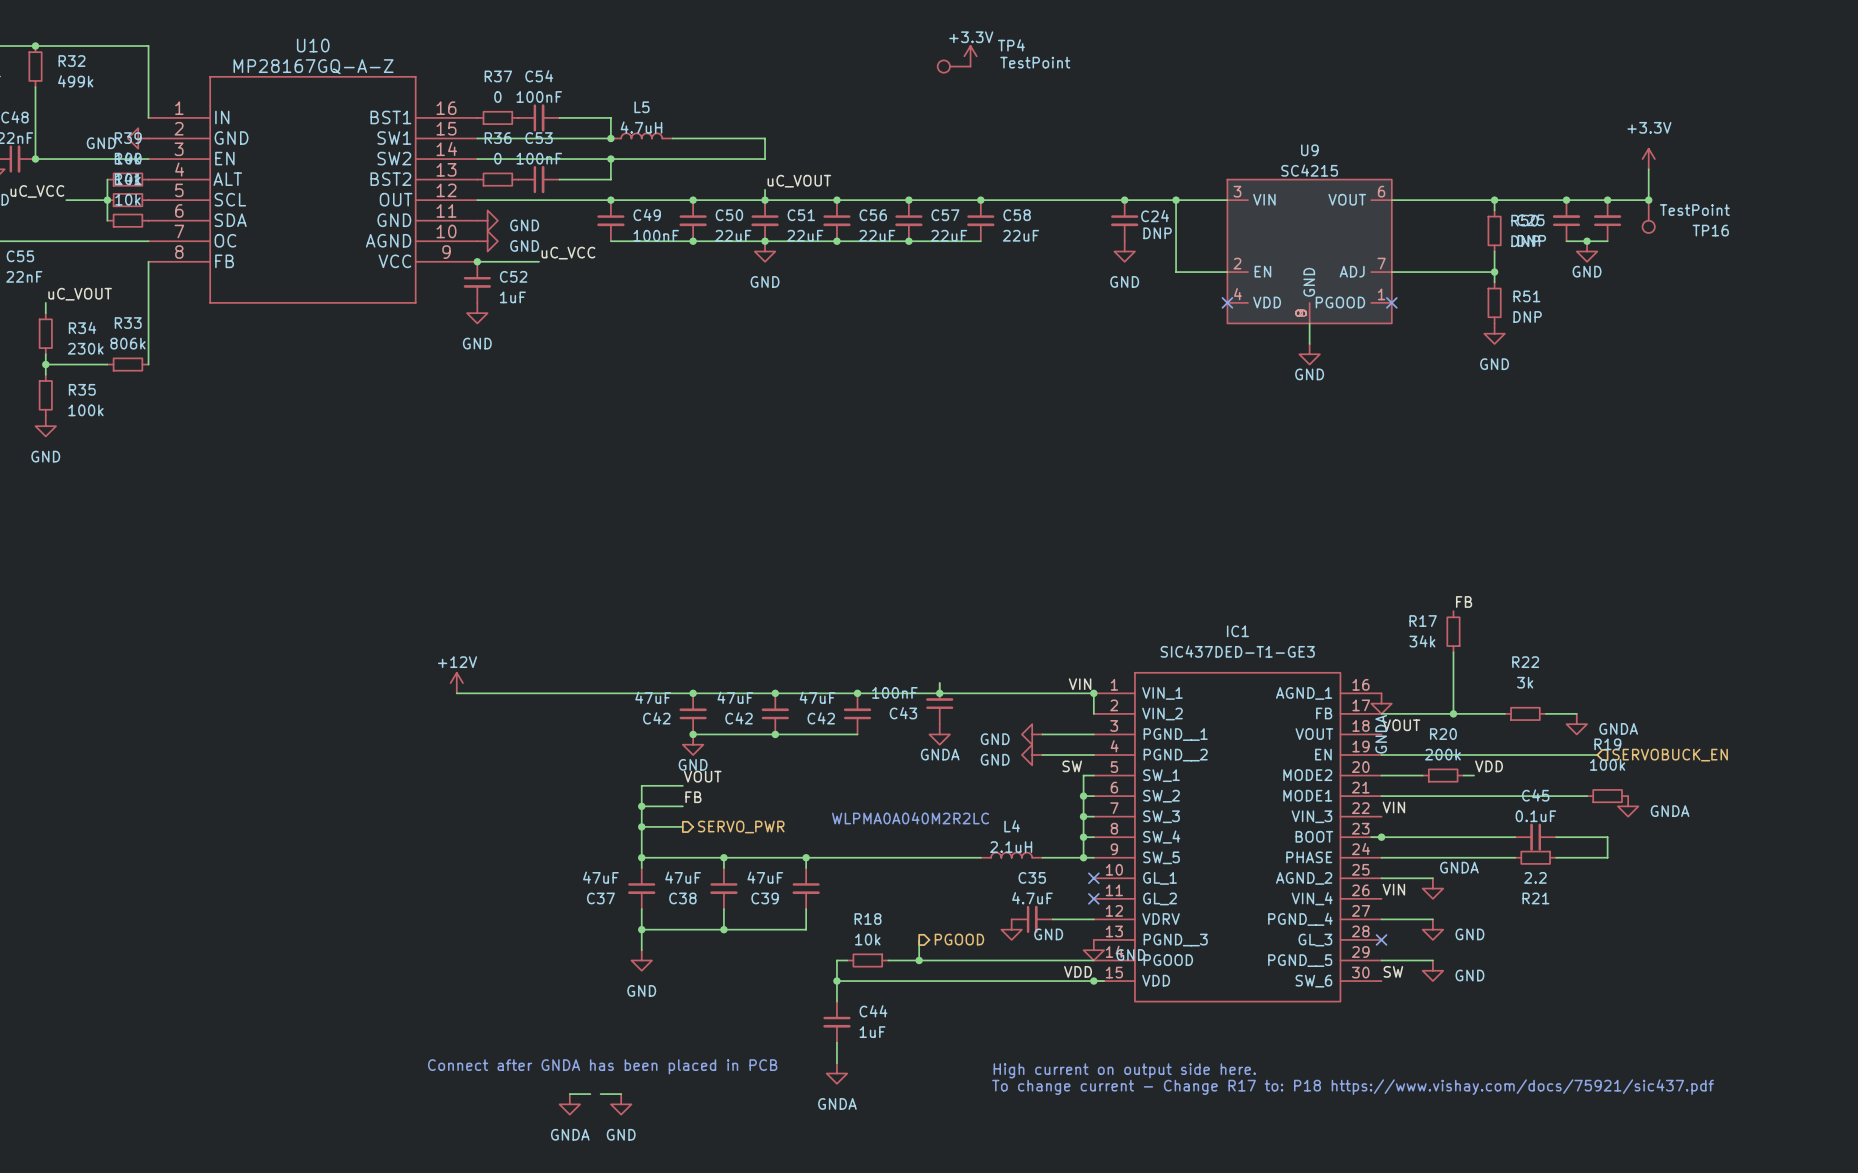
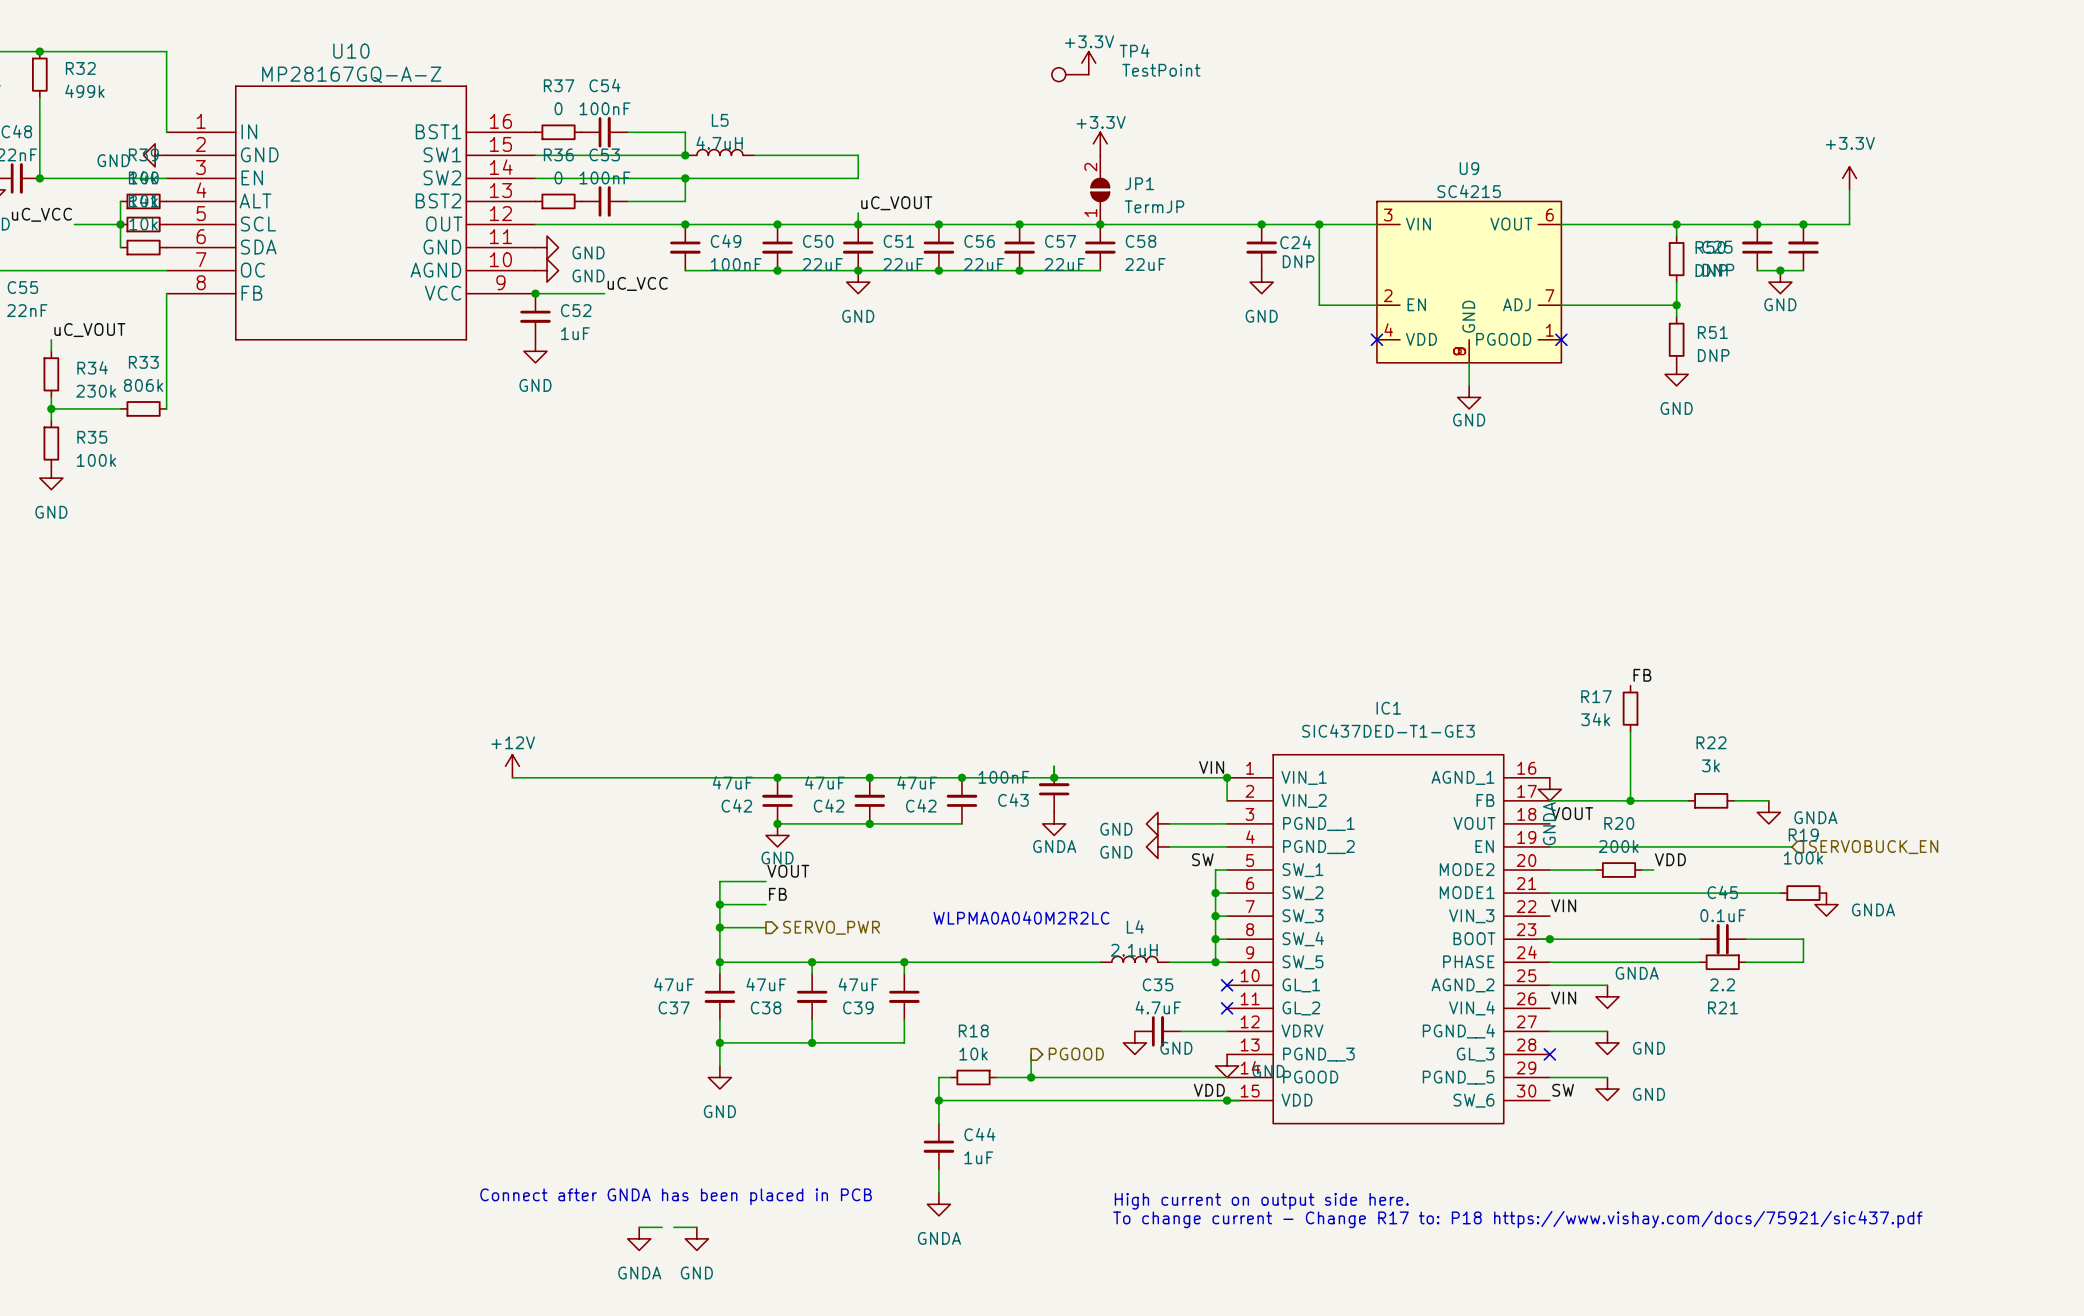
power symbol: none -> +3.3V (1100, 143)
JP1: none -> TermJP (1100, 189)
junction: (1648, 200) -> none
TP16: TestPoint (1648, 216) -> none

